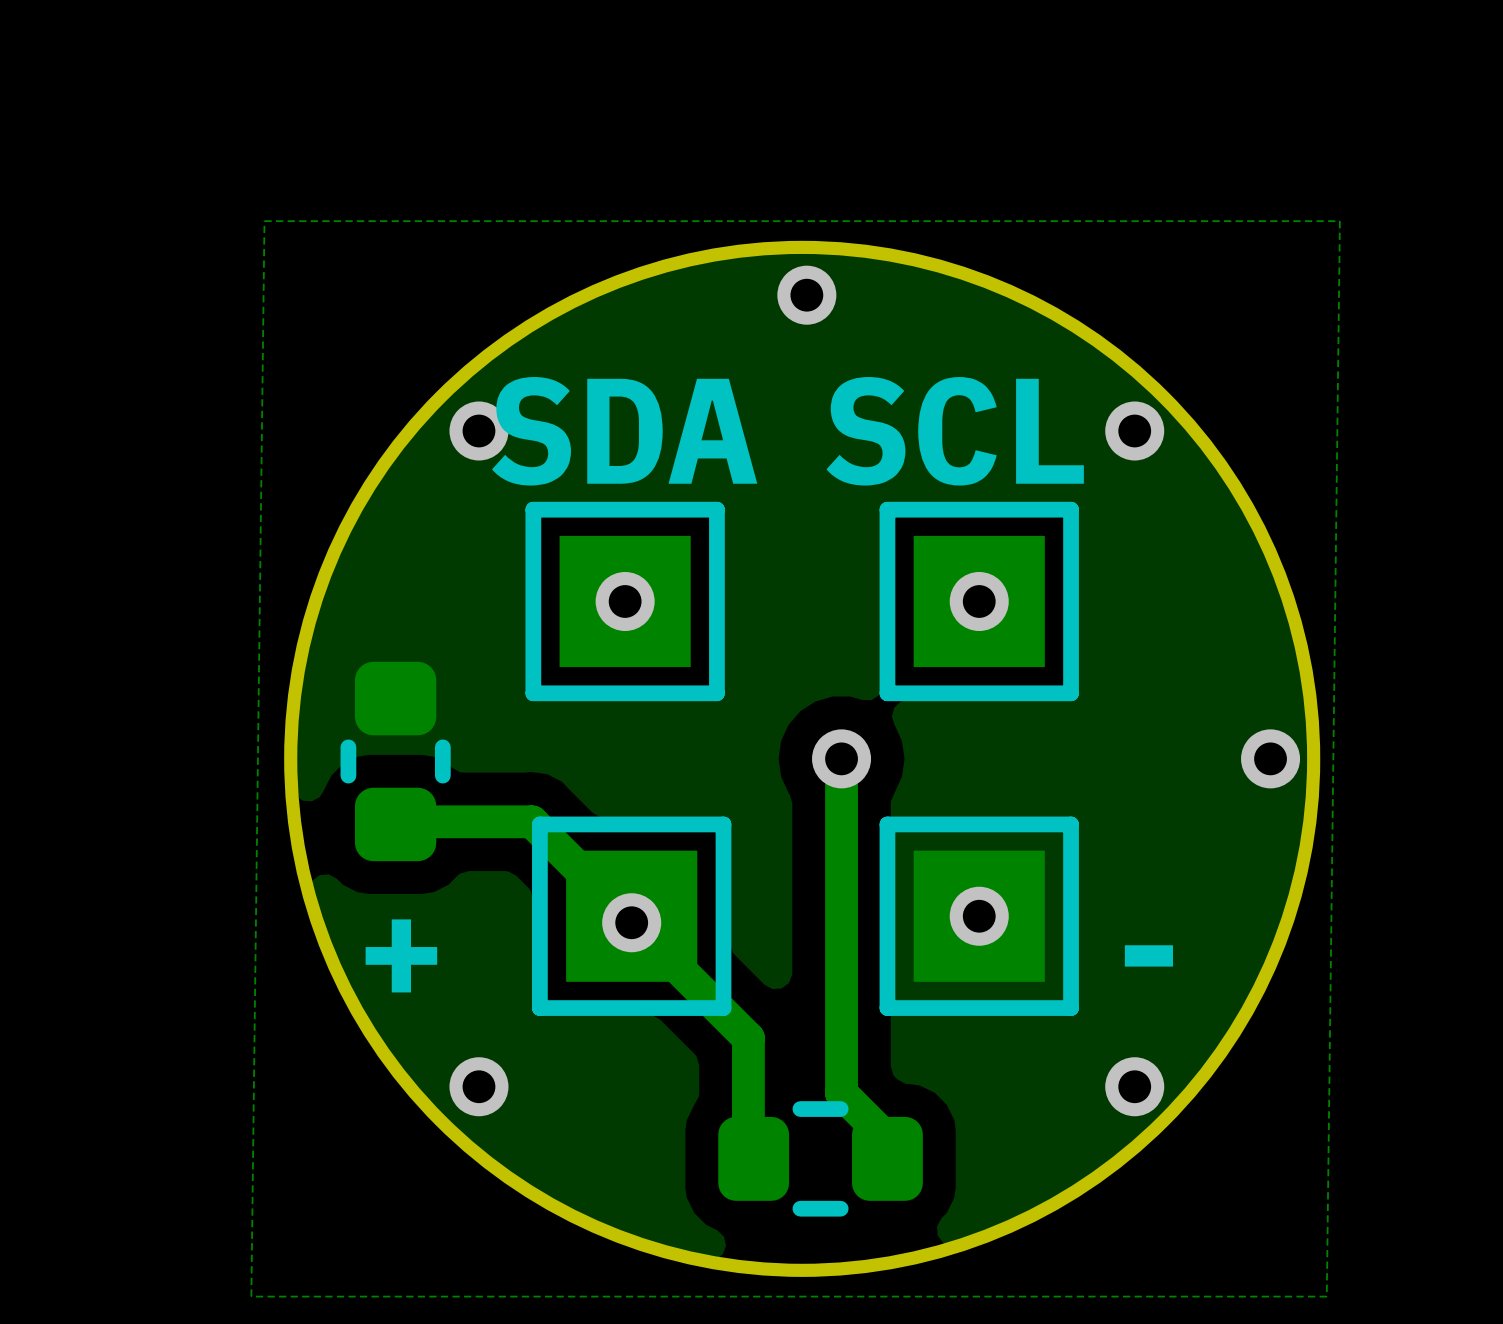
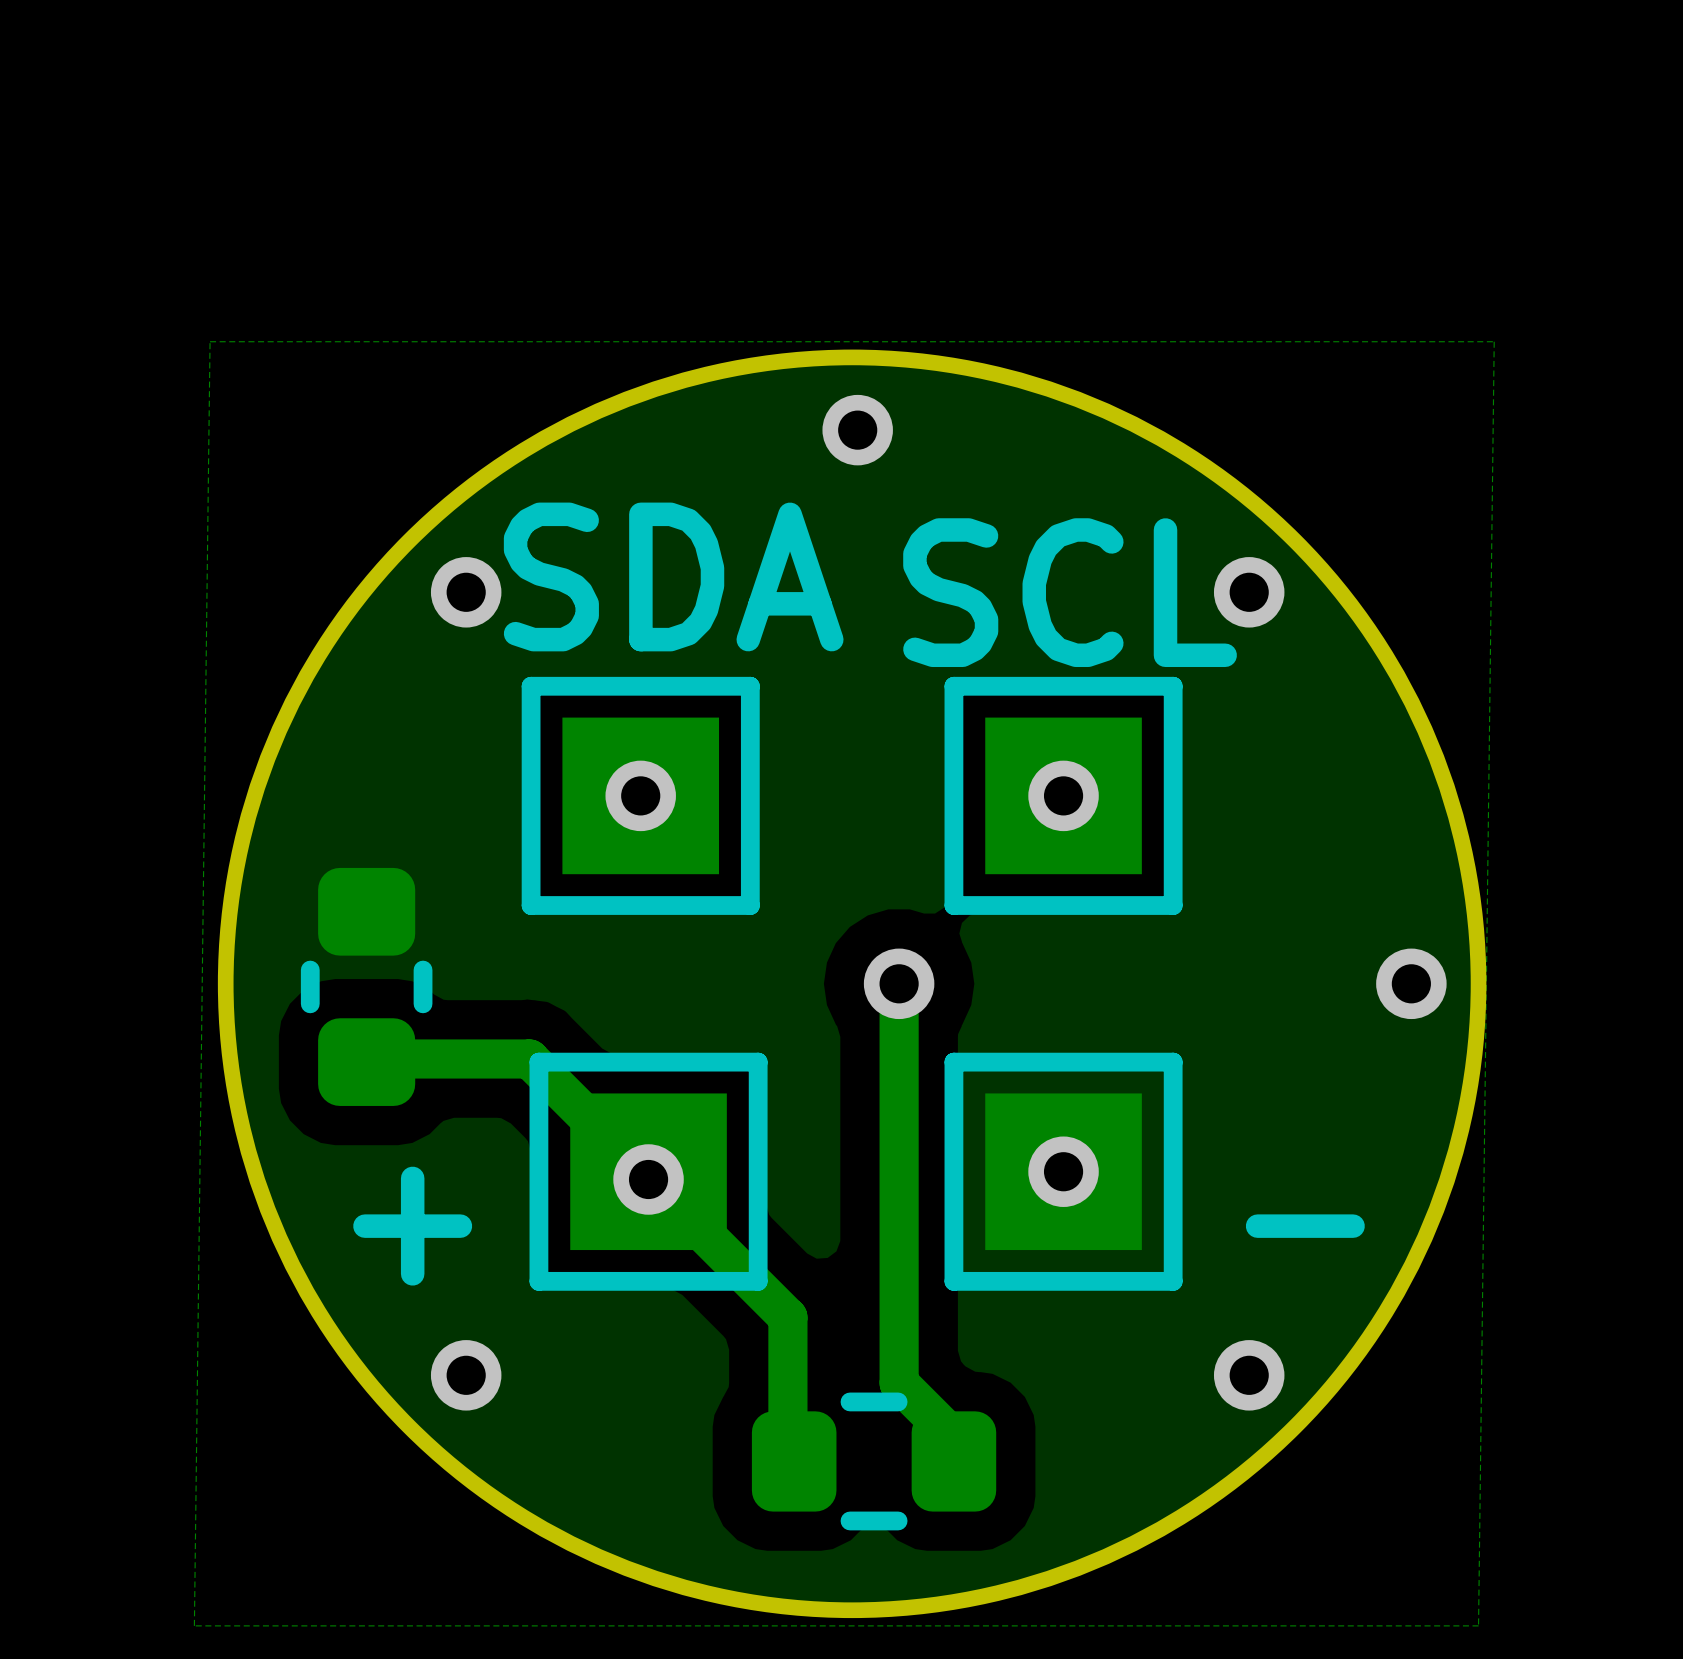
round board edge size: [284, 240, 1321, 1277] -> [217, 349, 1487, 1619]
text position: SDA (624, 431) -> SDA (673, 576)

